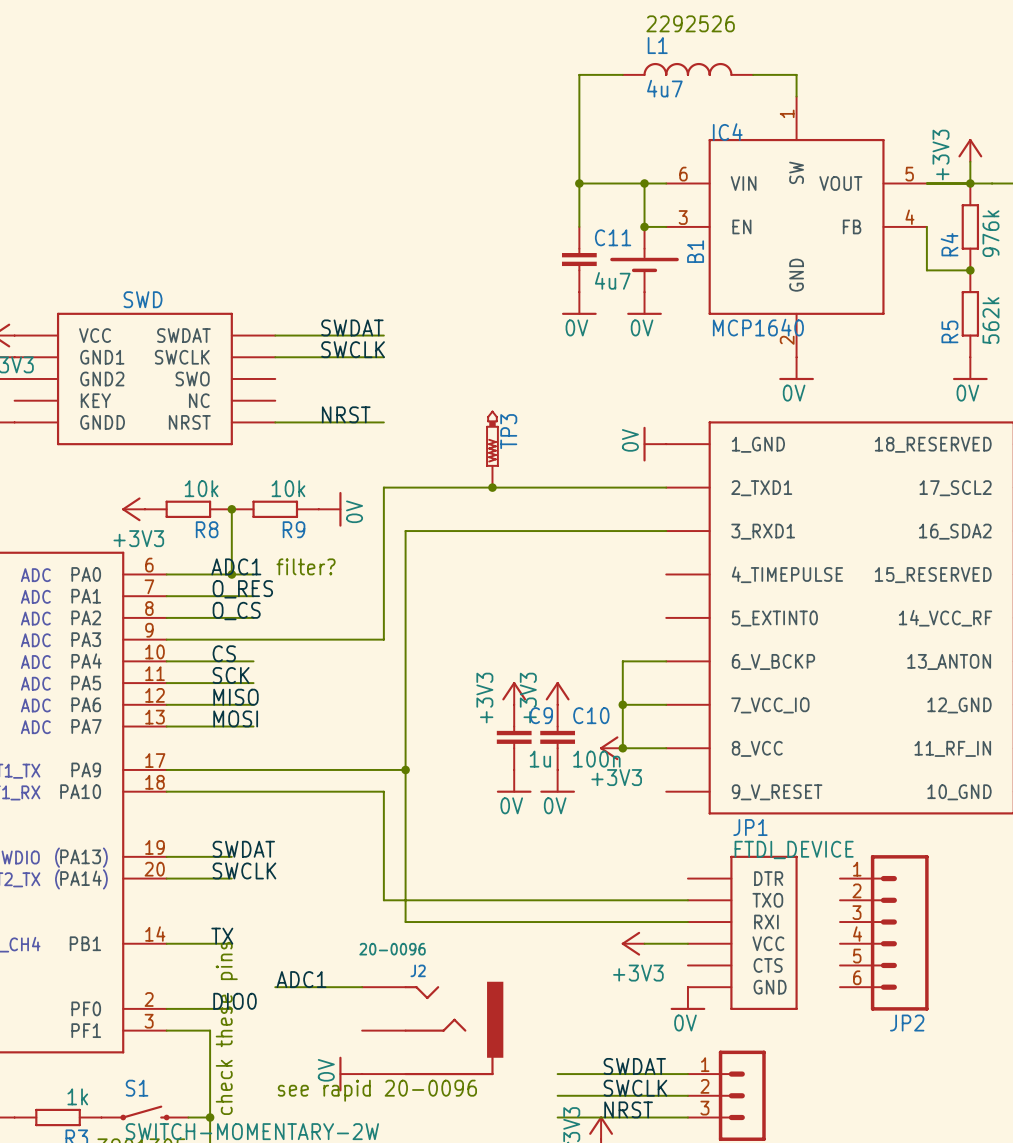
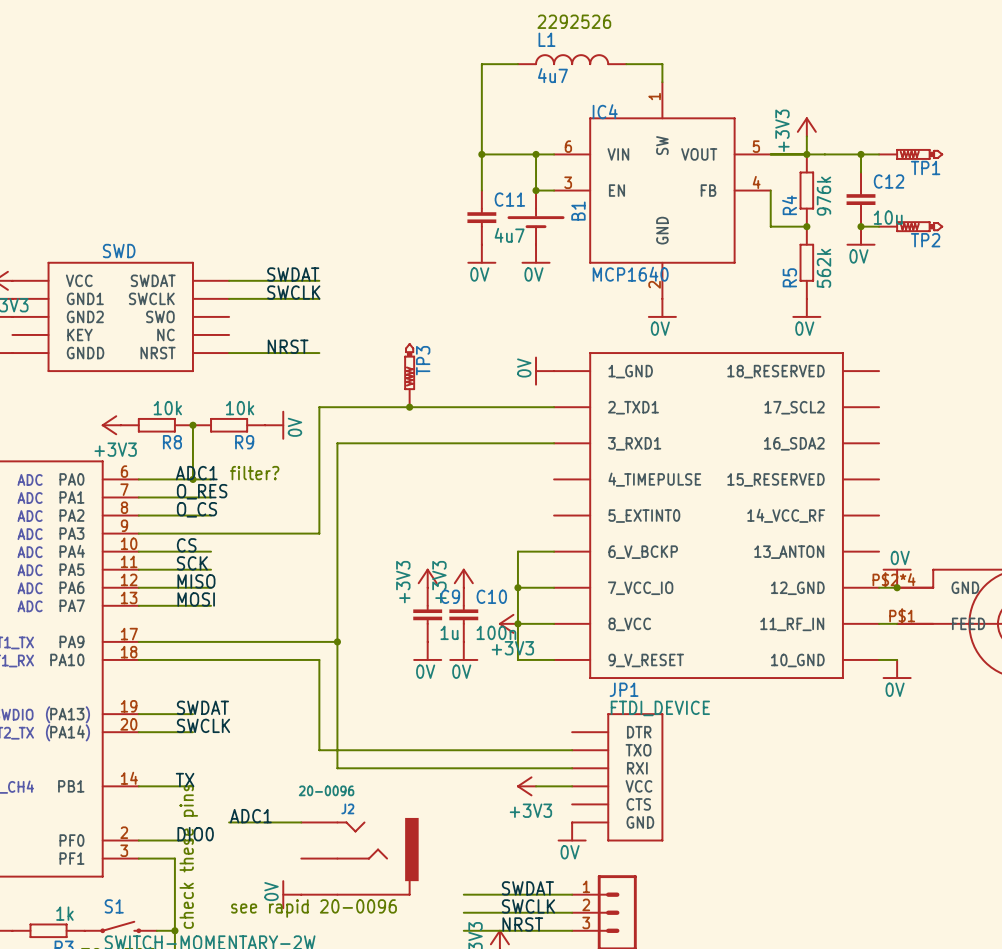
wire: none -> (517, 623) (517, 659) (554, 659)
JP2: (884, 932) -> none

